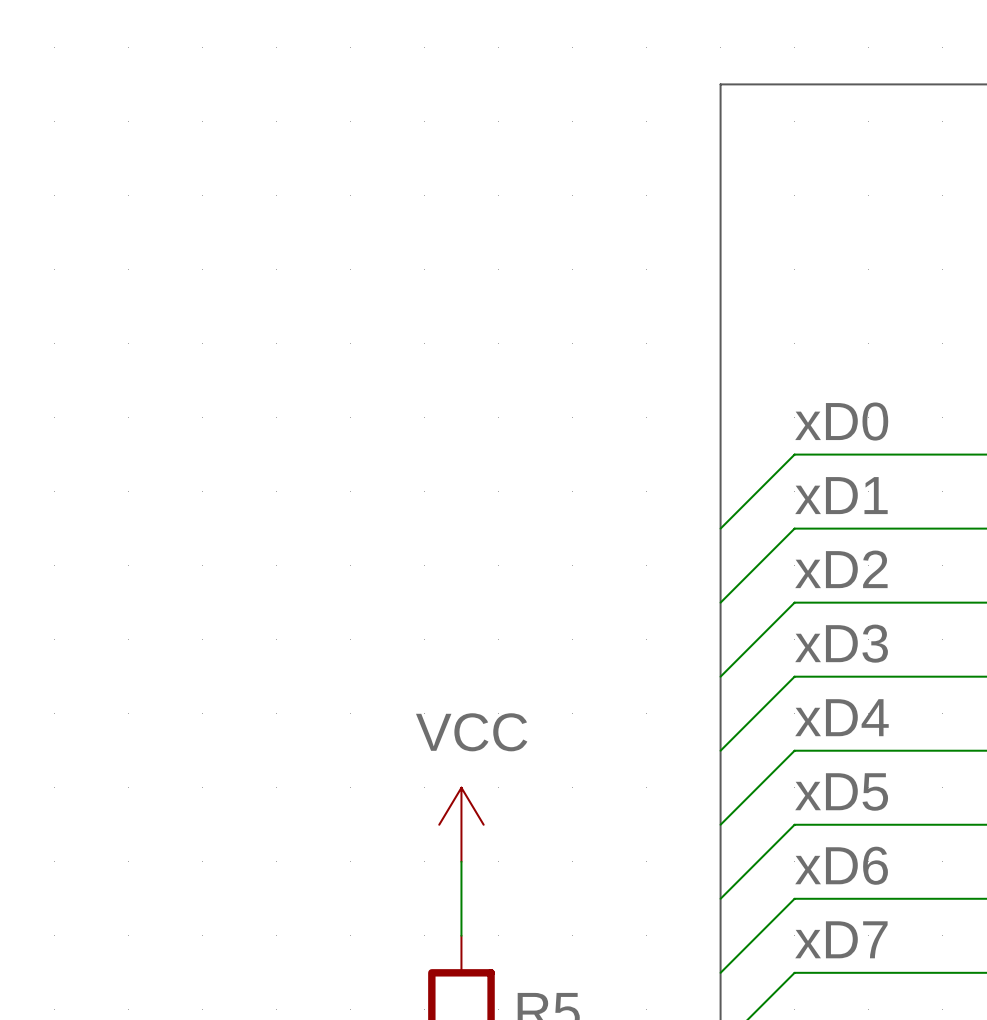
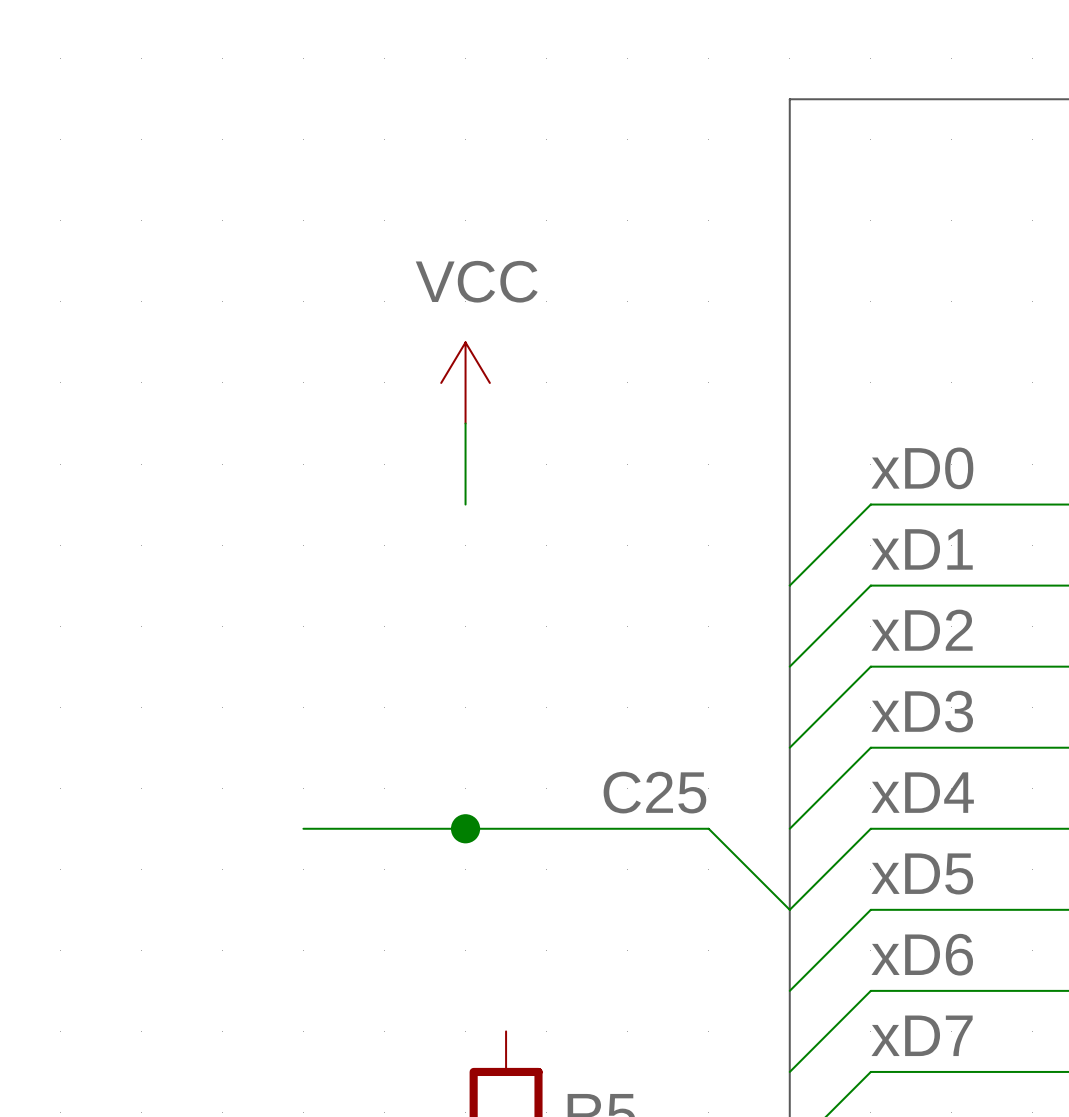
label: none -> C25 (654, 792)
wire: none -> (303, 828) (708, 828) (789, 909)
junction: none -> (465, 828)
power symbol position: VCC (461, 824) -> VCC (465, 382)
wire: (461, 861) (461, 935) -> (465, 423) (465, 504)

